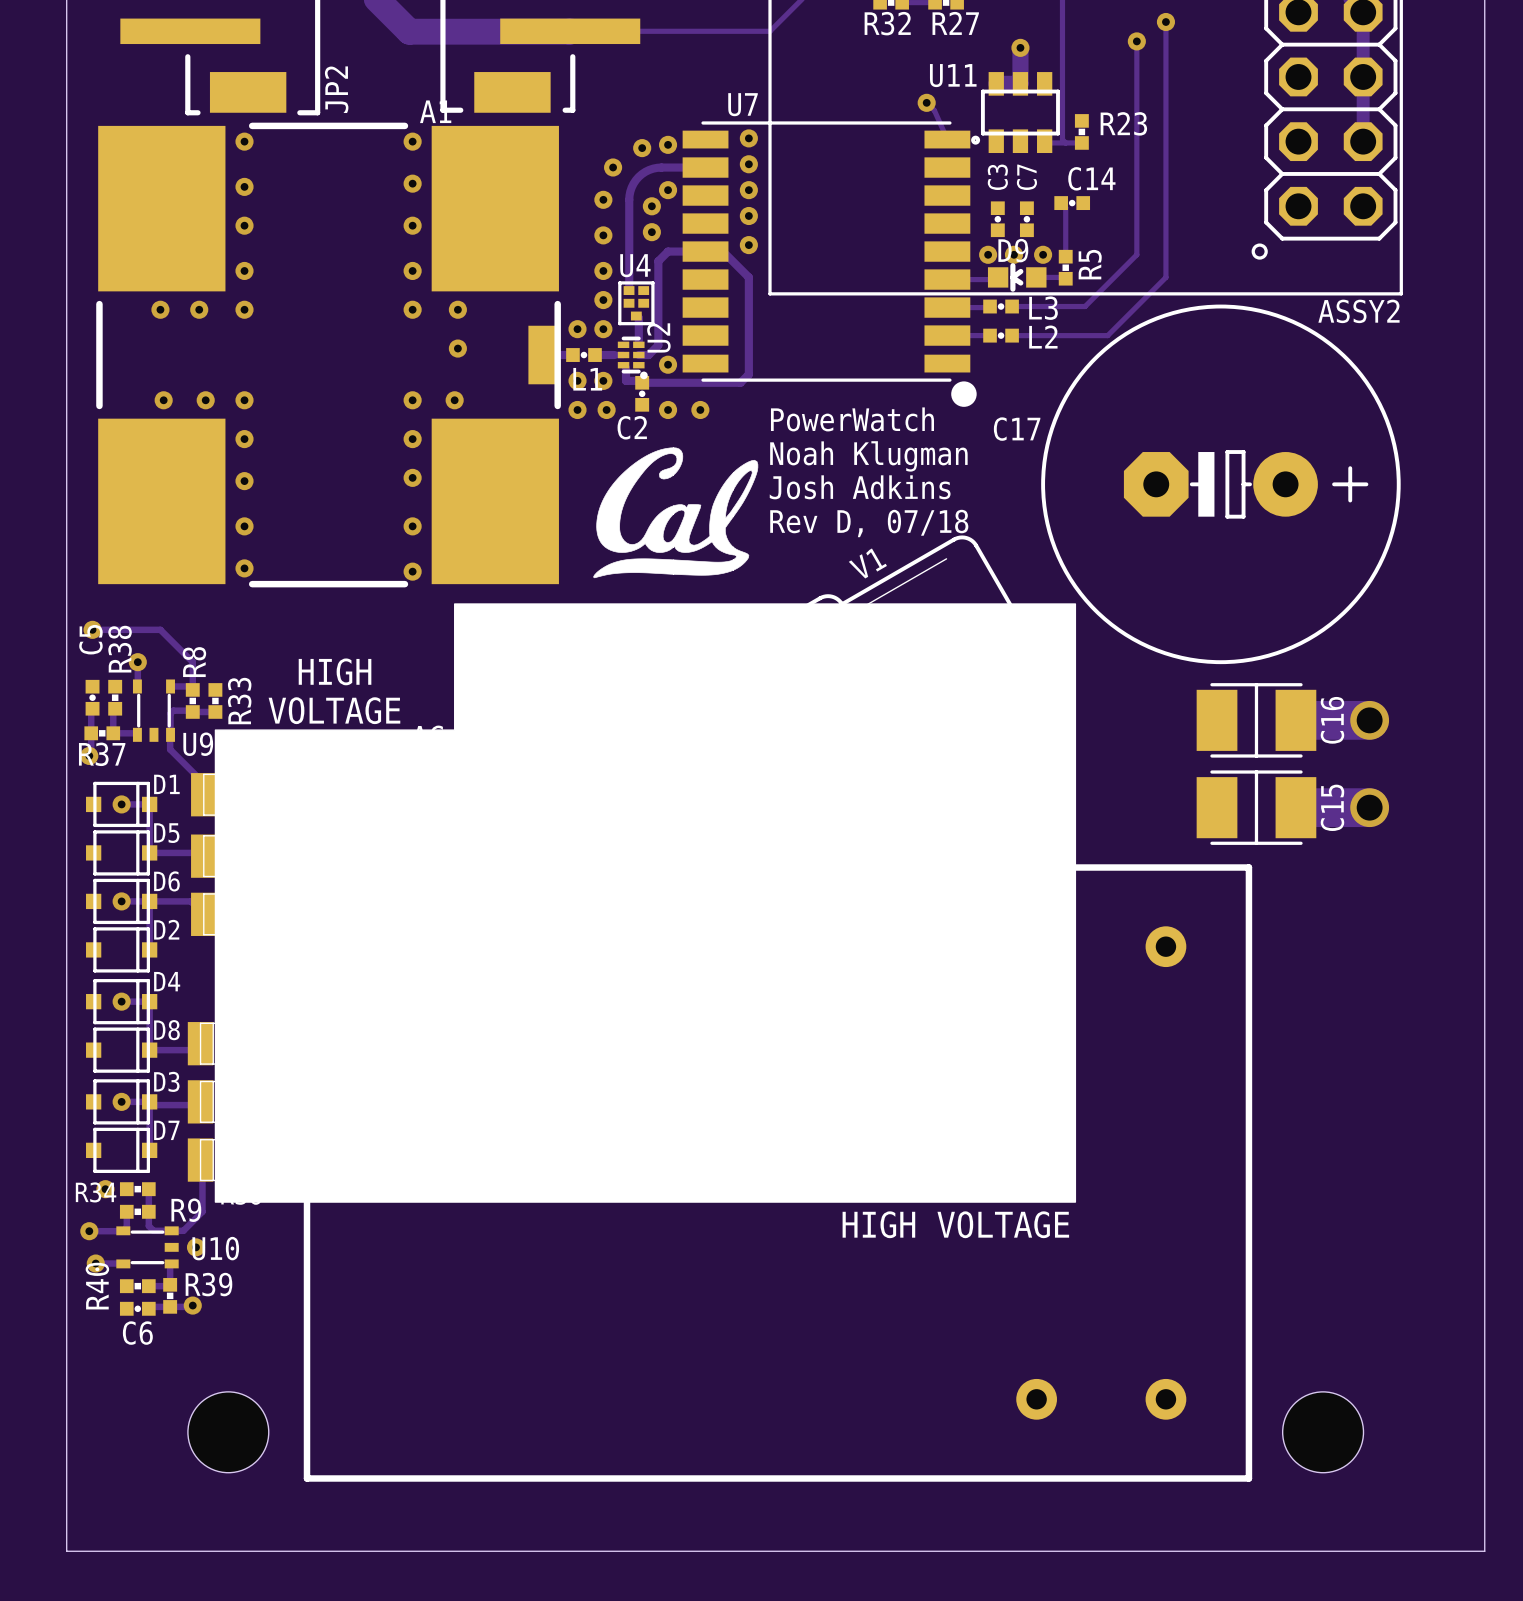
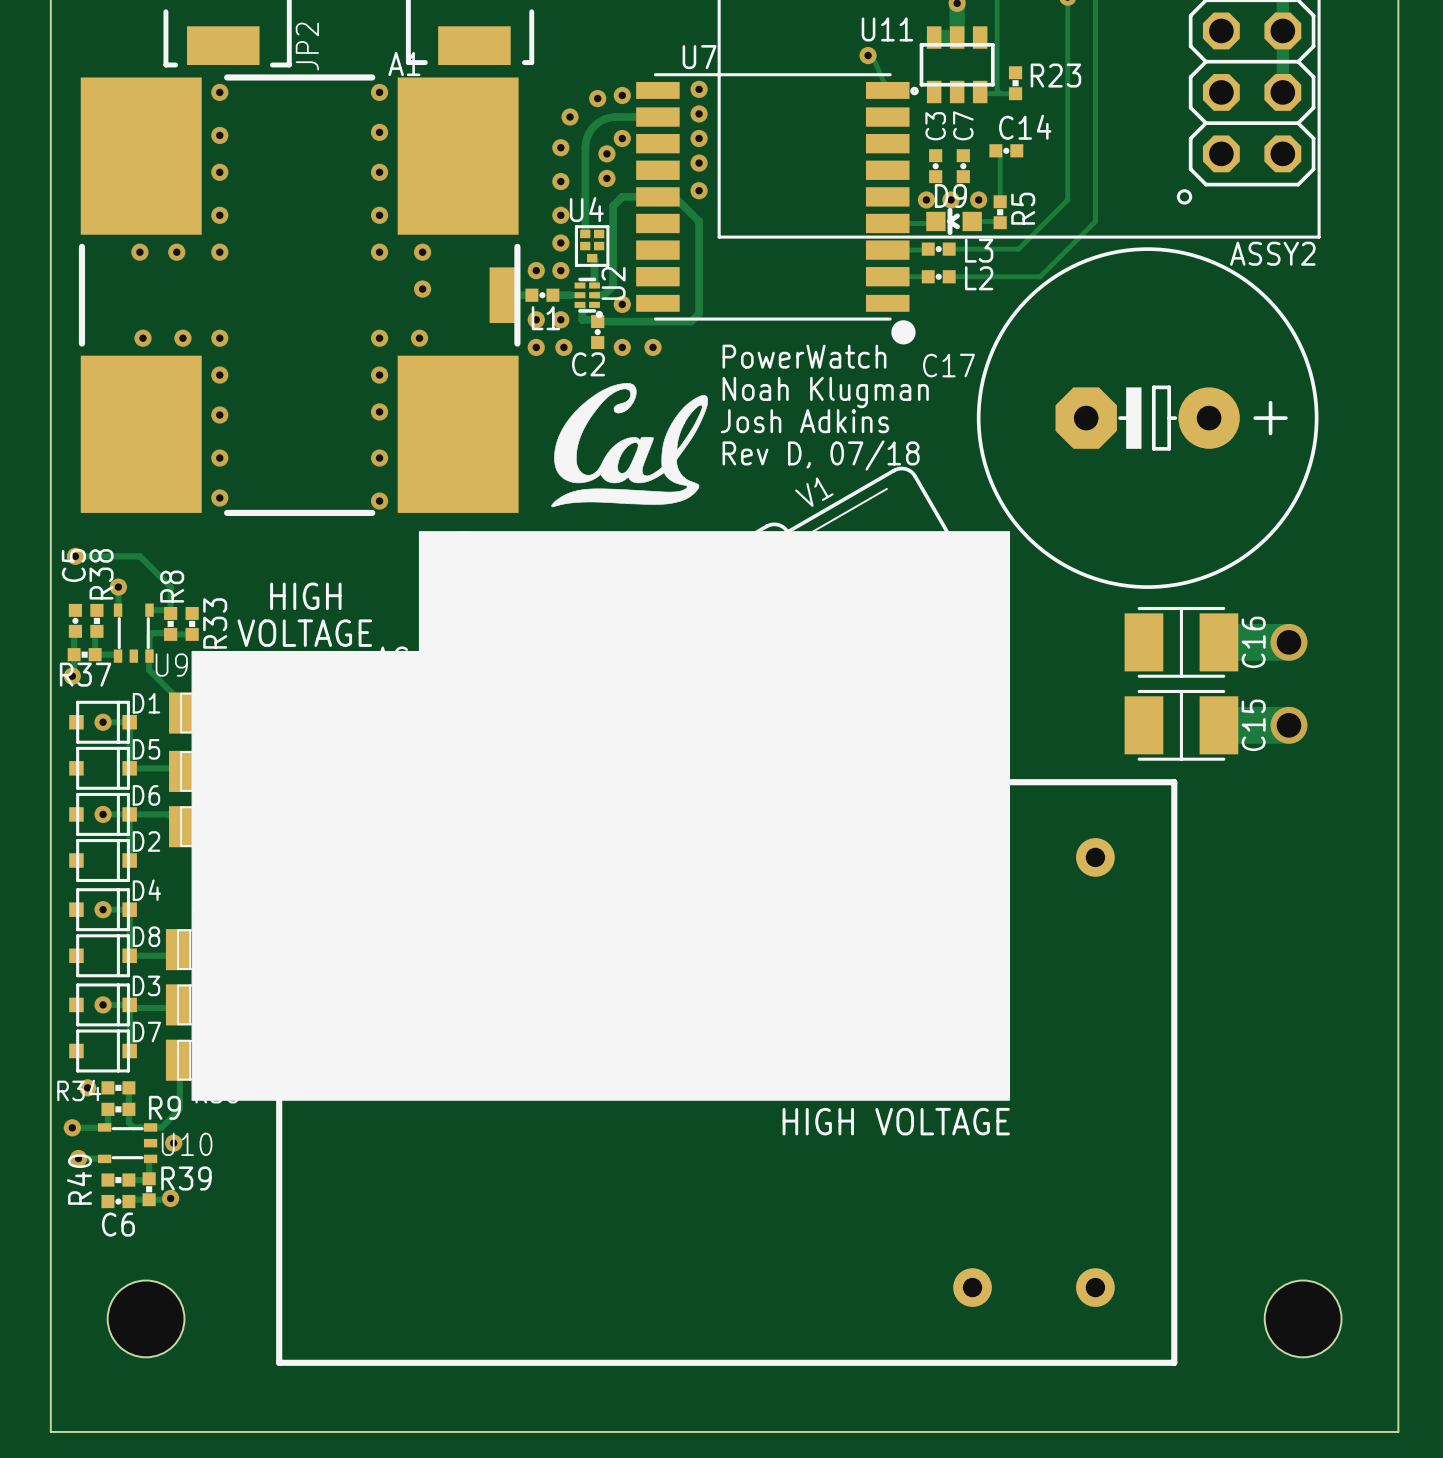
hole position: (228, 1432) -> (146, 1318)
hole position: (1323, 1432) -> (1303, 1318)

